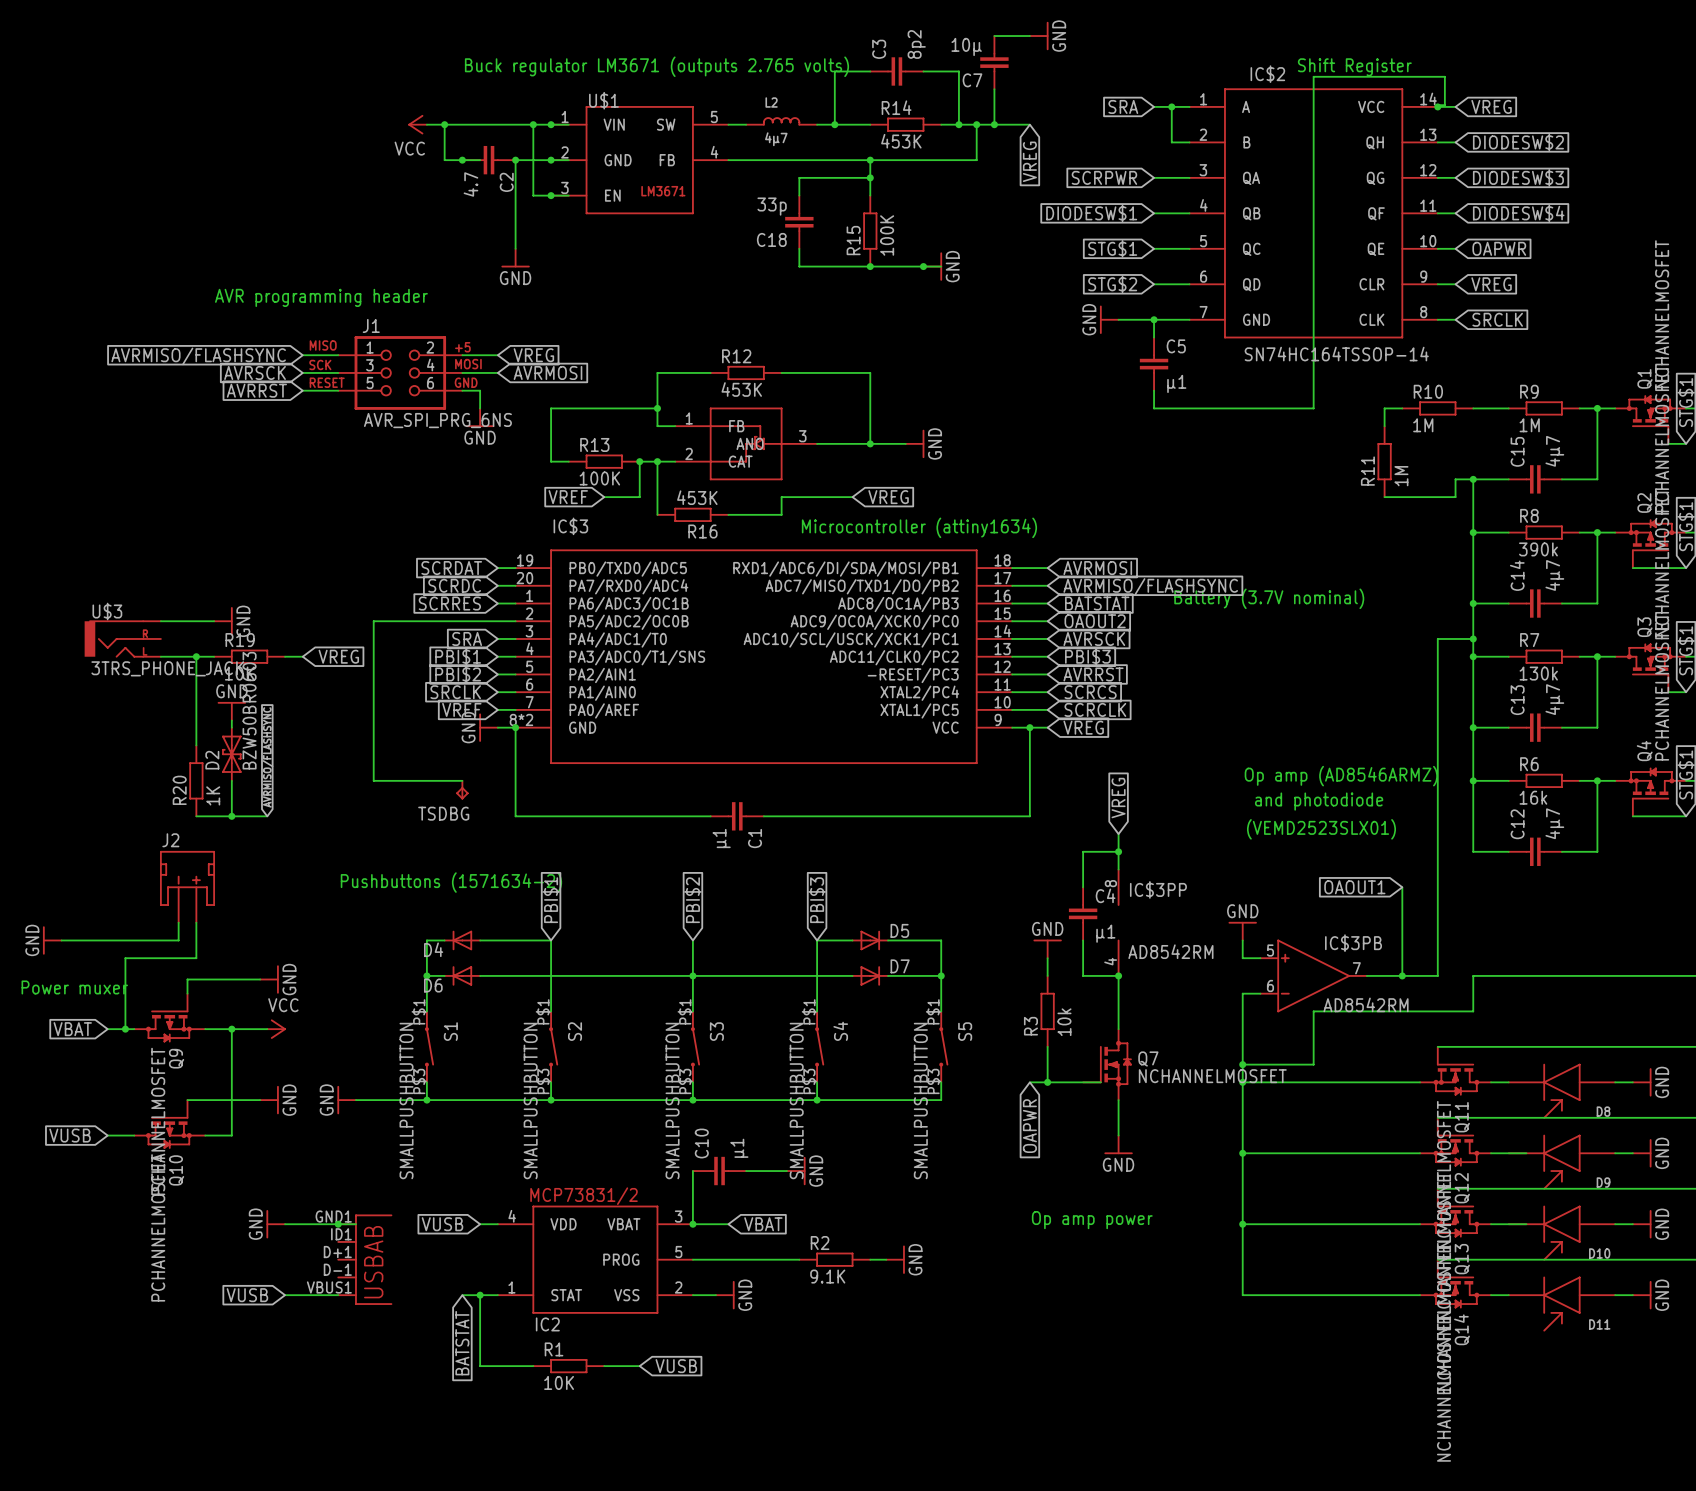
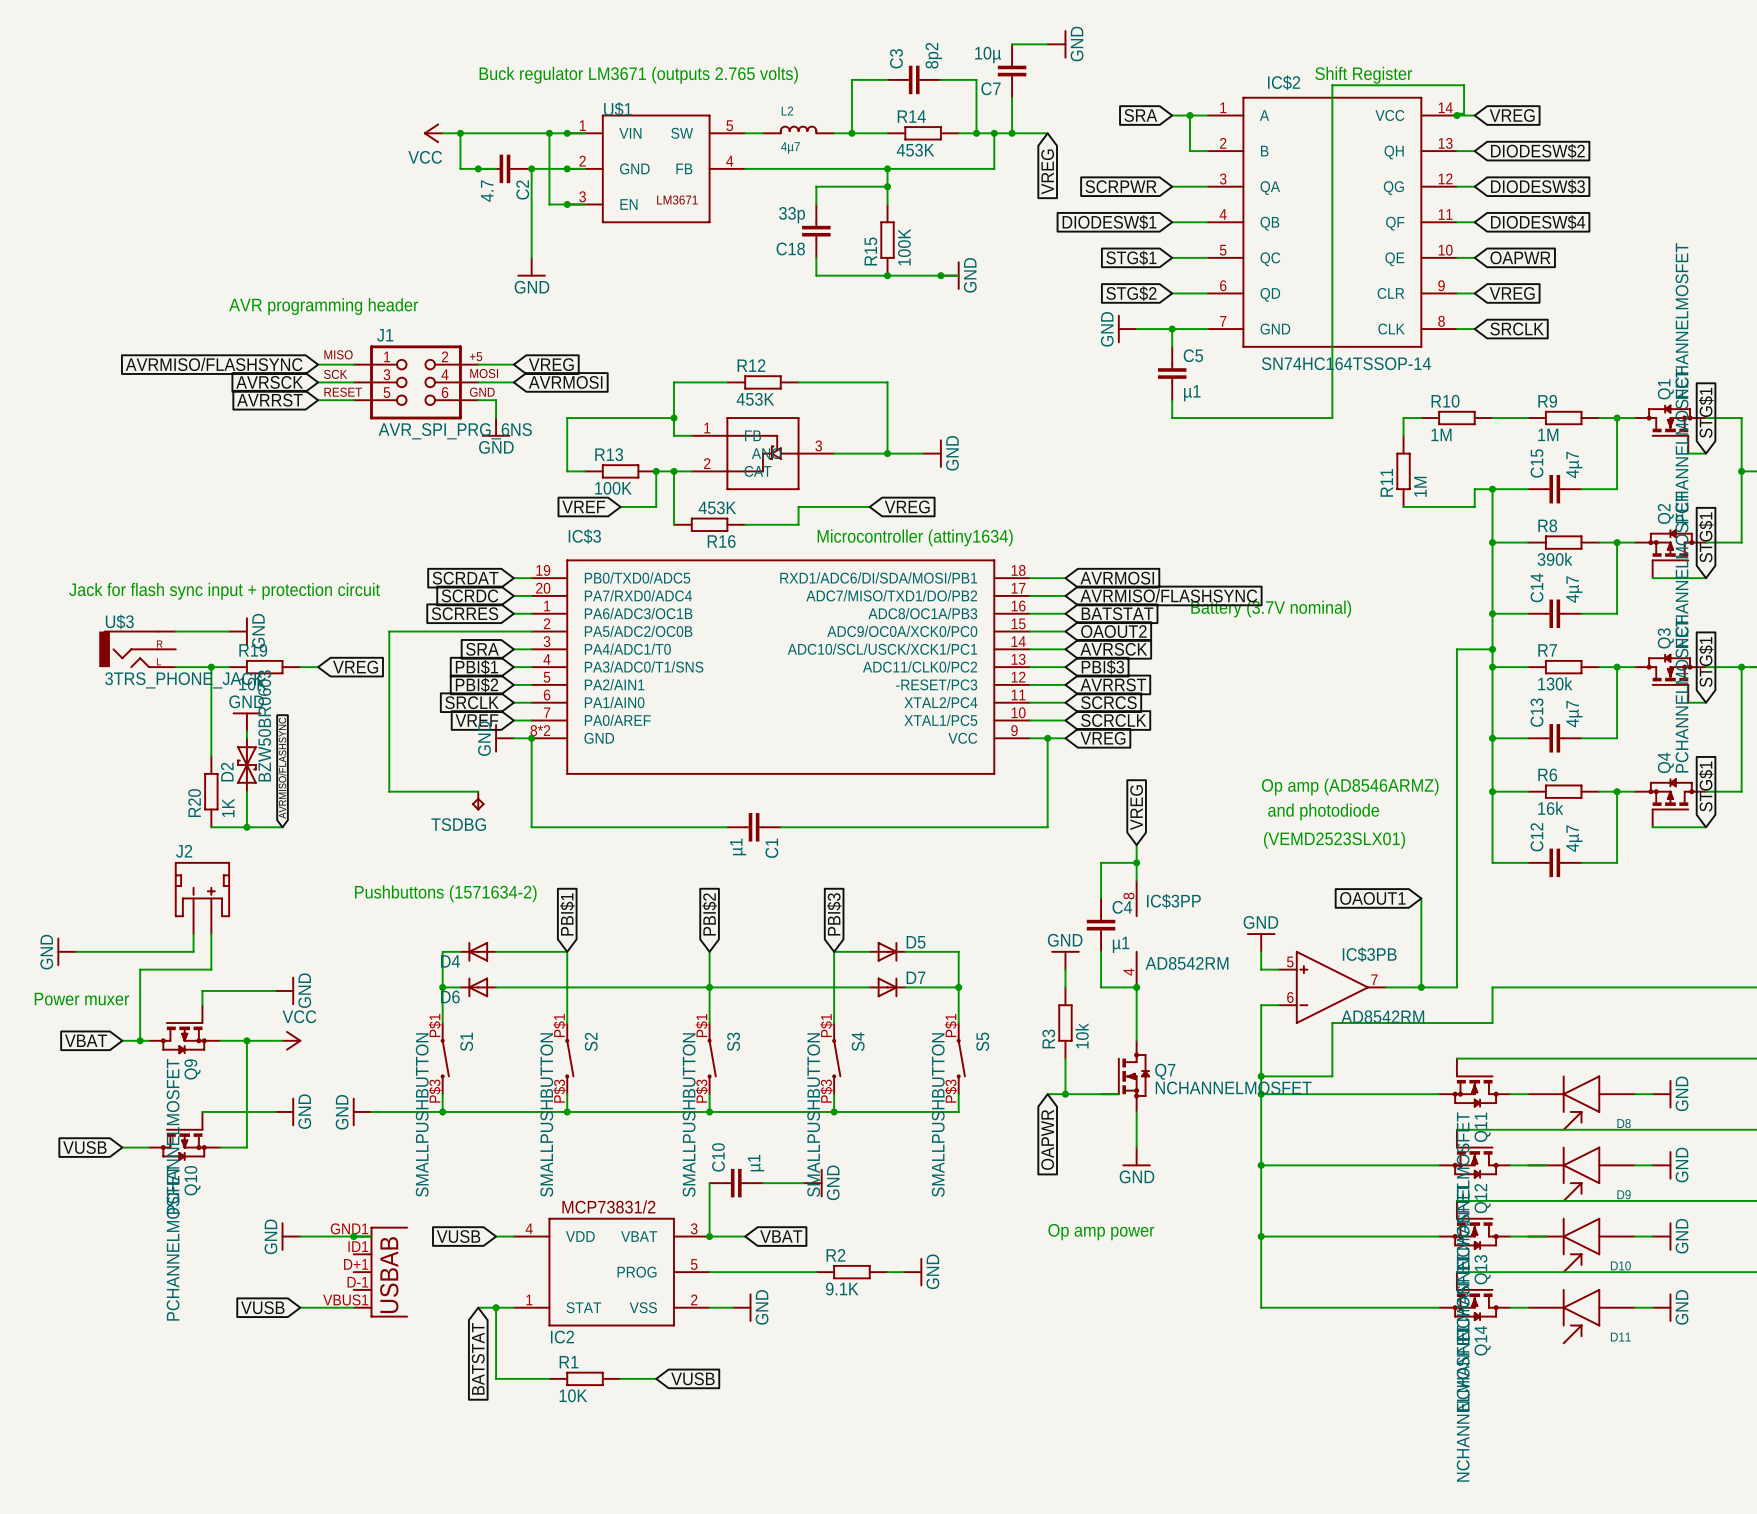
text: none -> Jack for flash sync input + protection circuit (224, 591)

